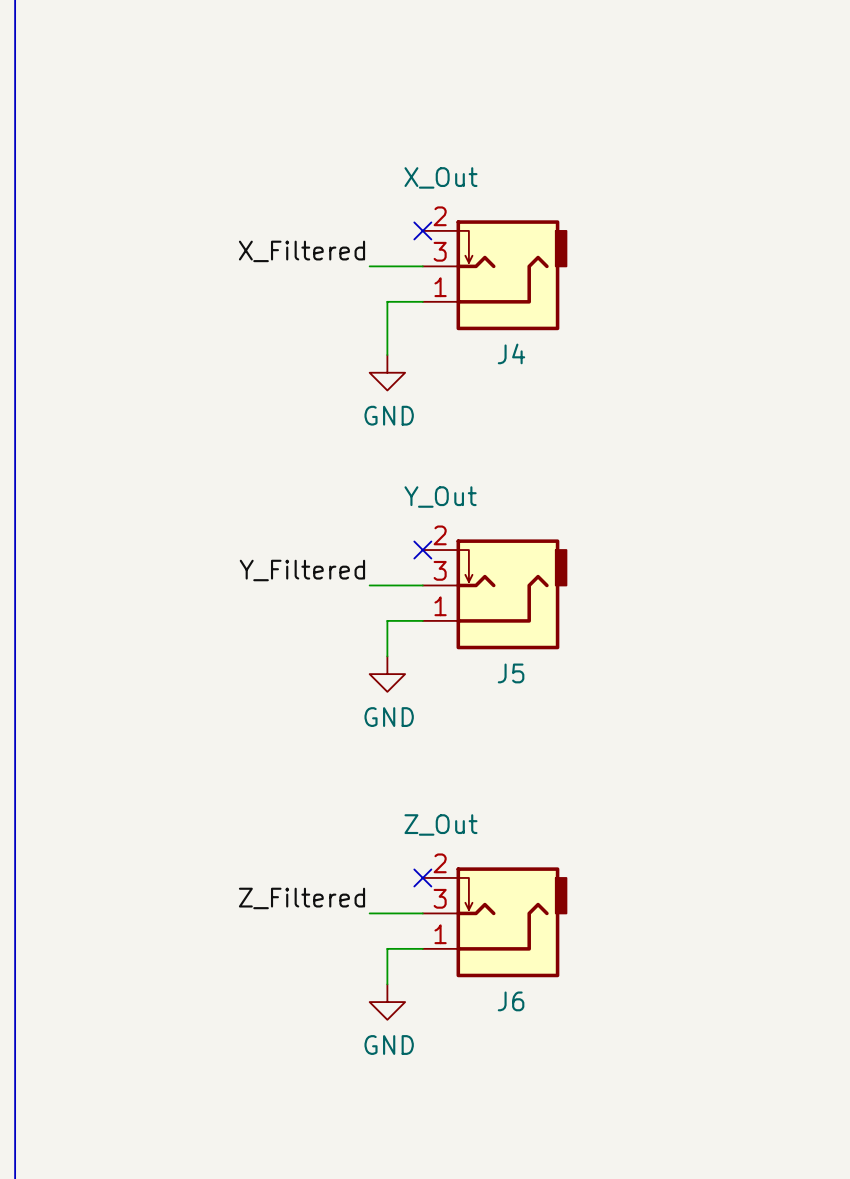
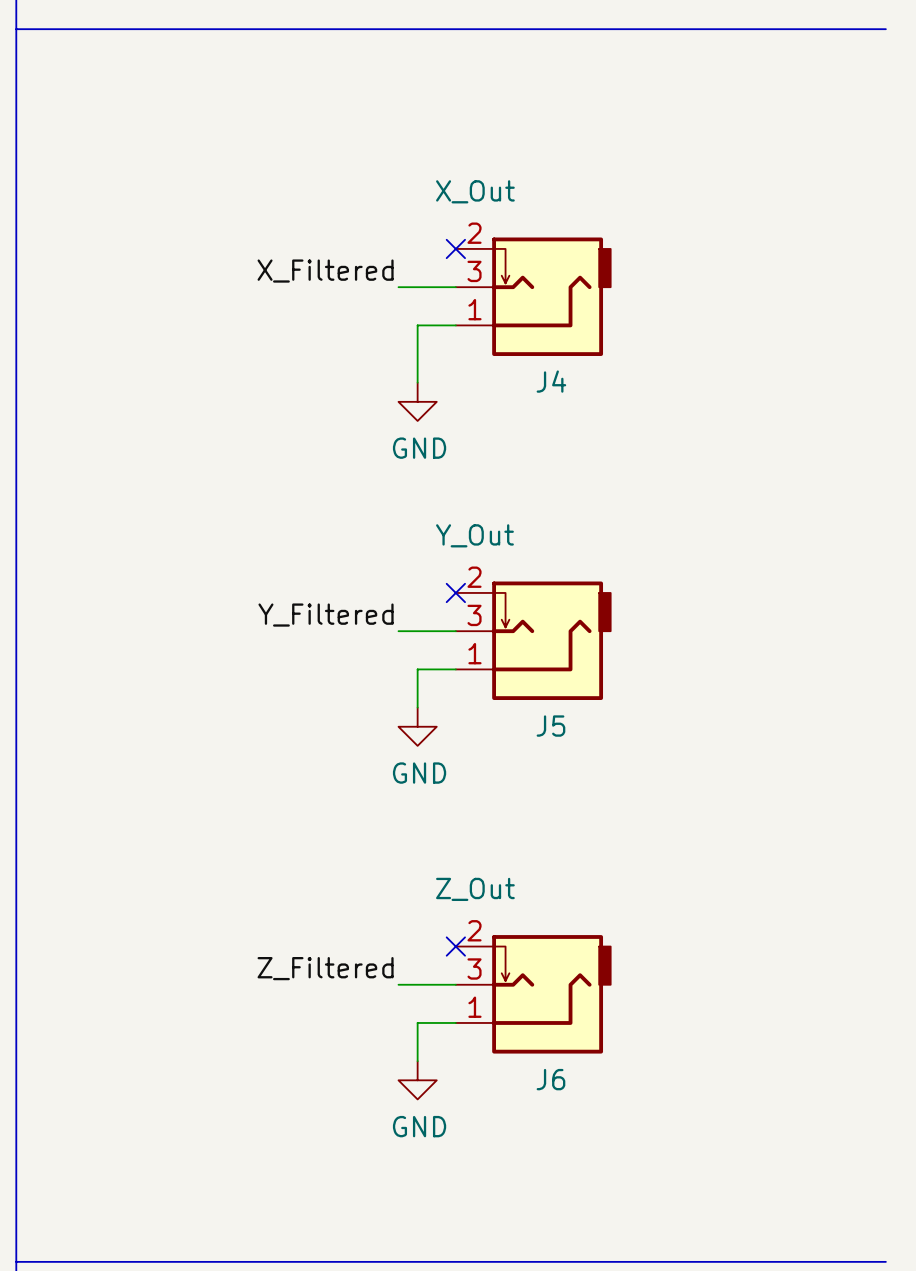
line: none -> (16, 29) (885, 29)
line: none -> (16, 1261) (885, 1261)

